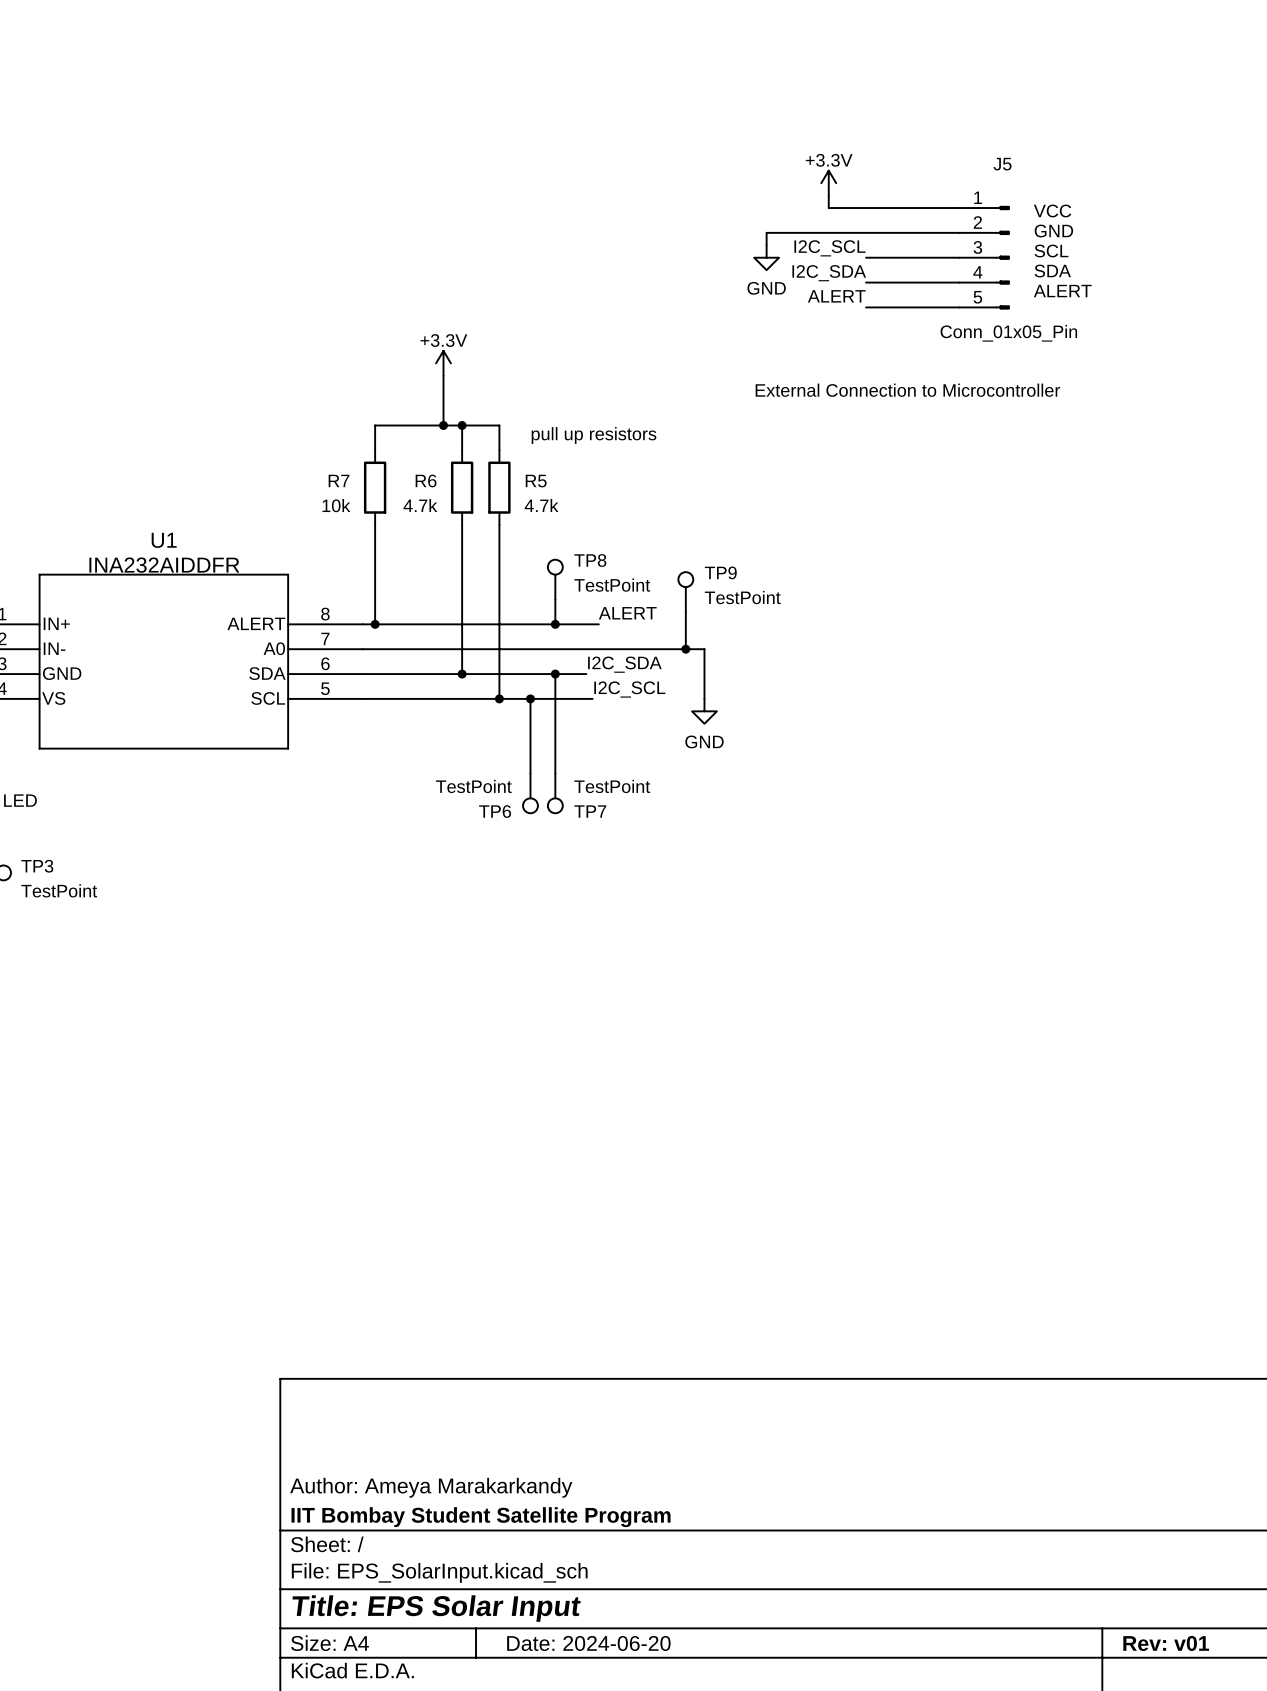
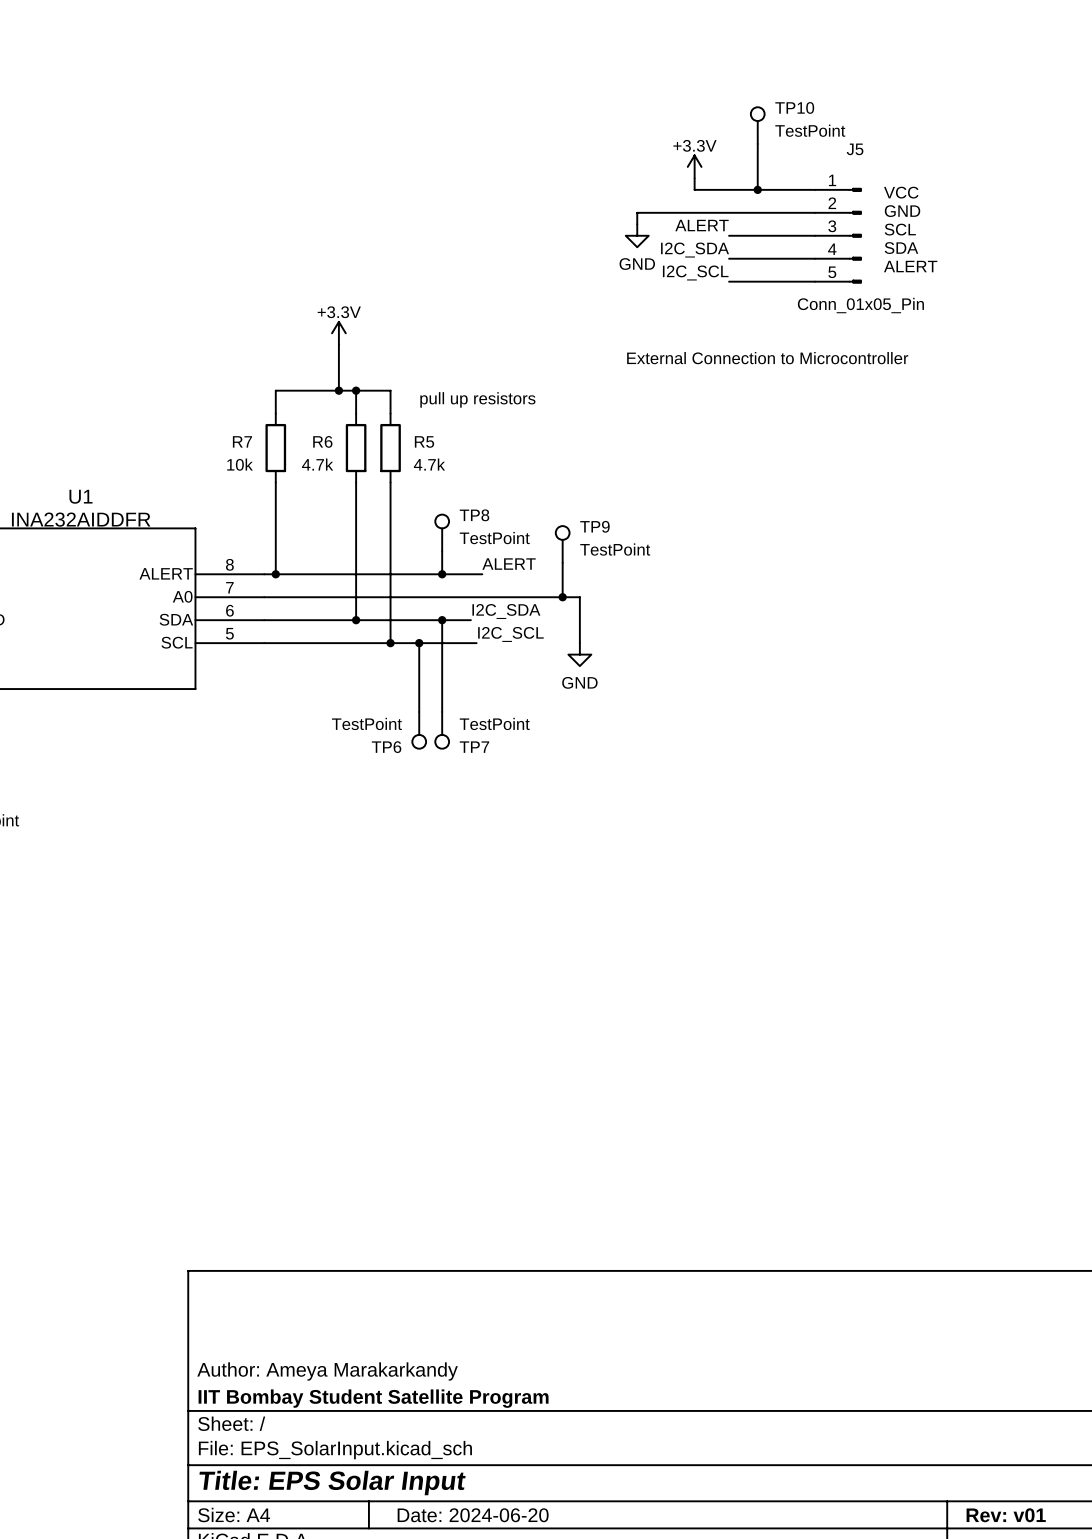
TP10: none -> TestPoint (757, 125)
wire: none -> (757, 143) (757, 189)
junction: none -> (757, 189)
label: I2C_SCL (829, 248) -> ALERT (702, 225)
label: ALERT (836, 296) -> I2C_SCL (695, 273)

